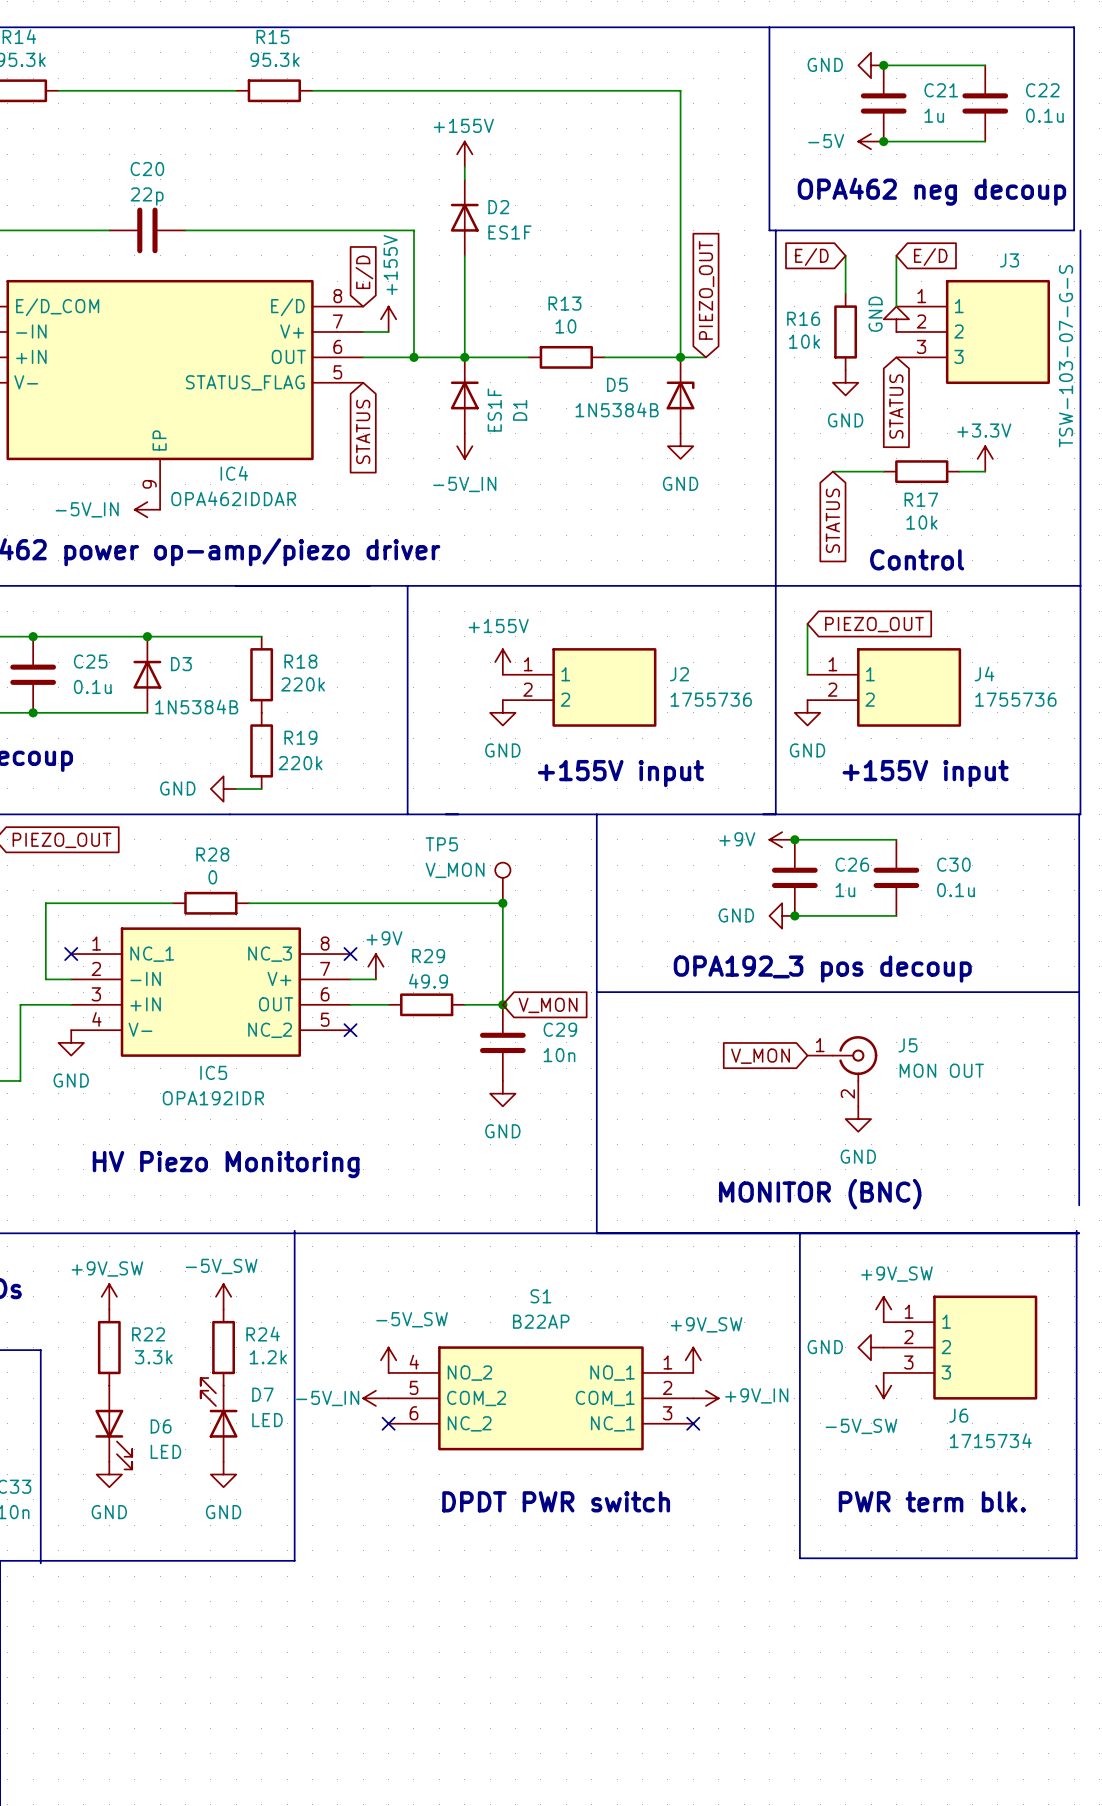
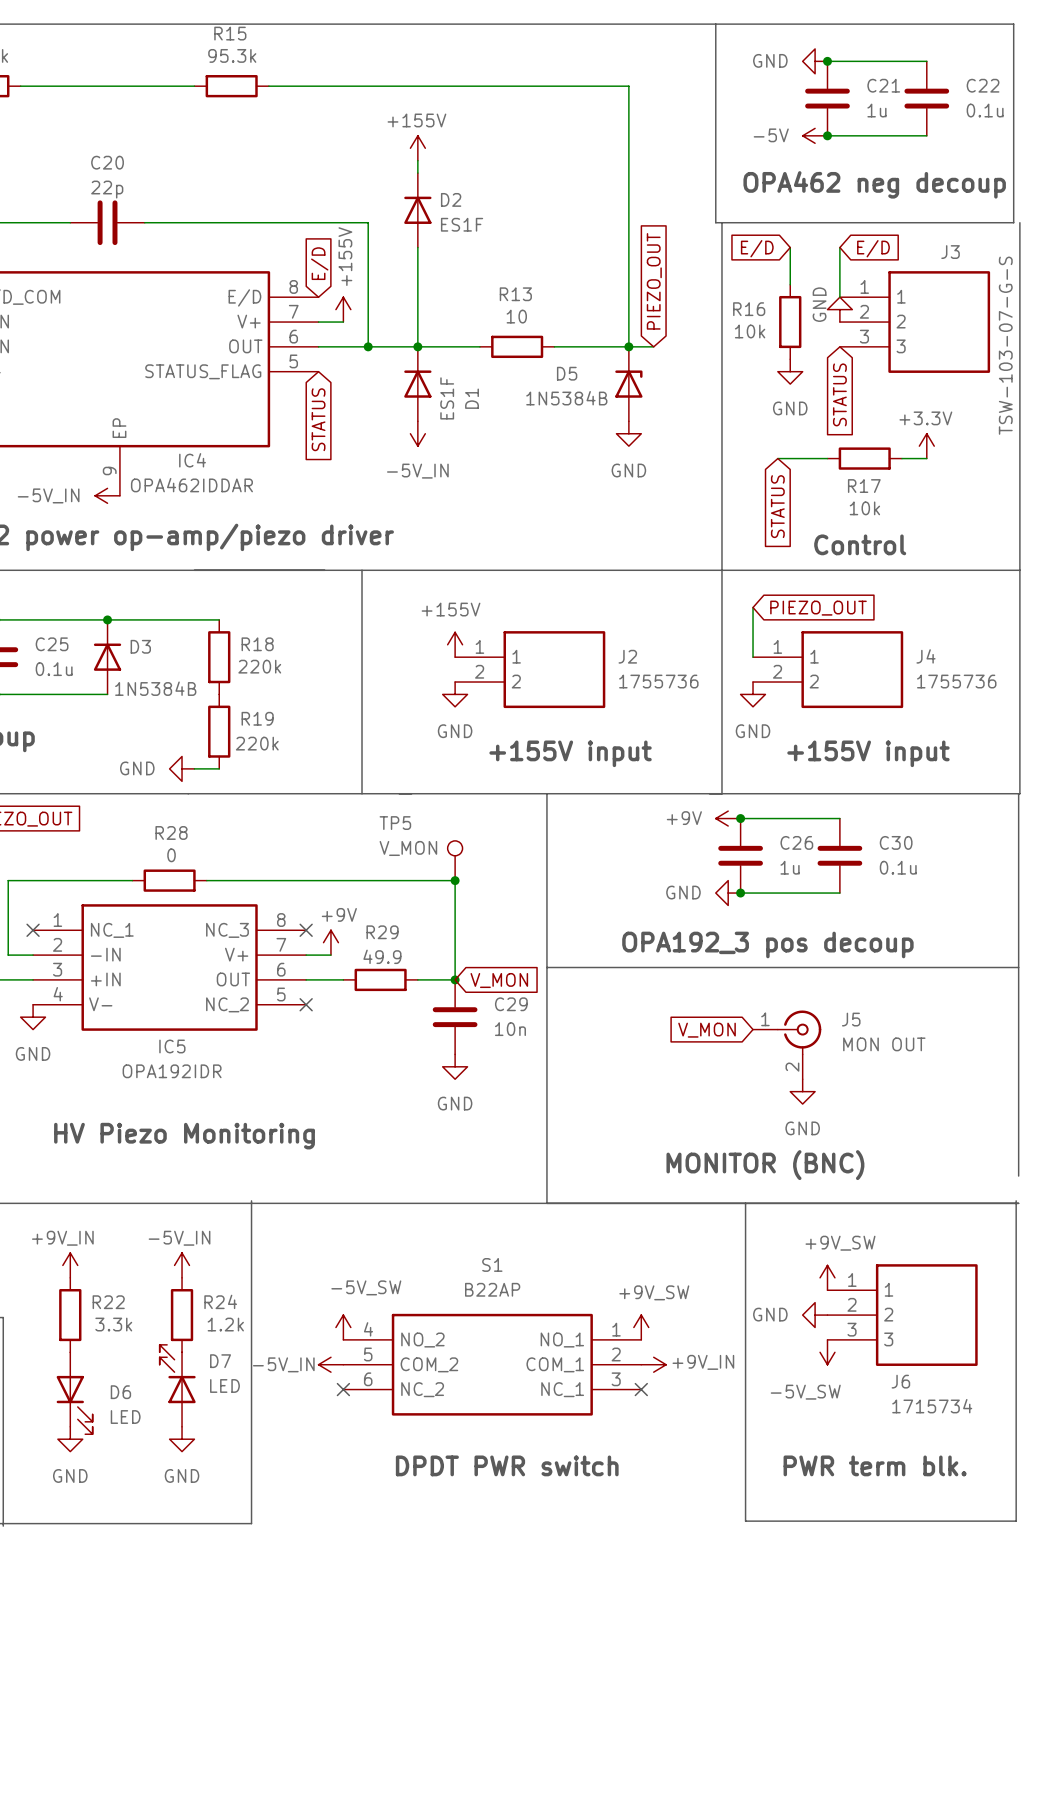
power symbol: +9V_SW (109, 1296) -> +9V_IN (70, 1265)
power symbol: -5V_SW (223, 1296) -> -5V_IN (182, 1265)

